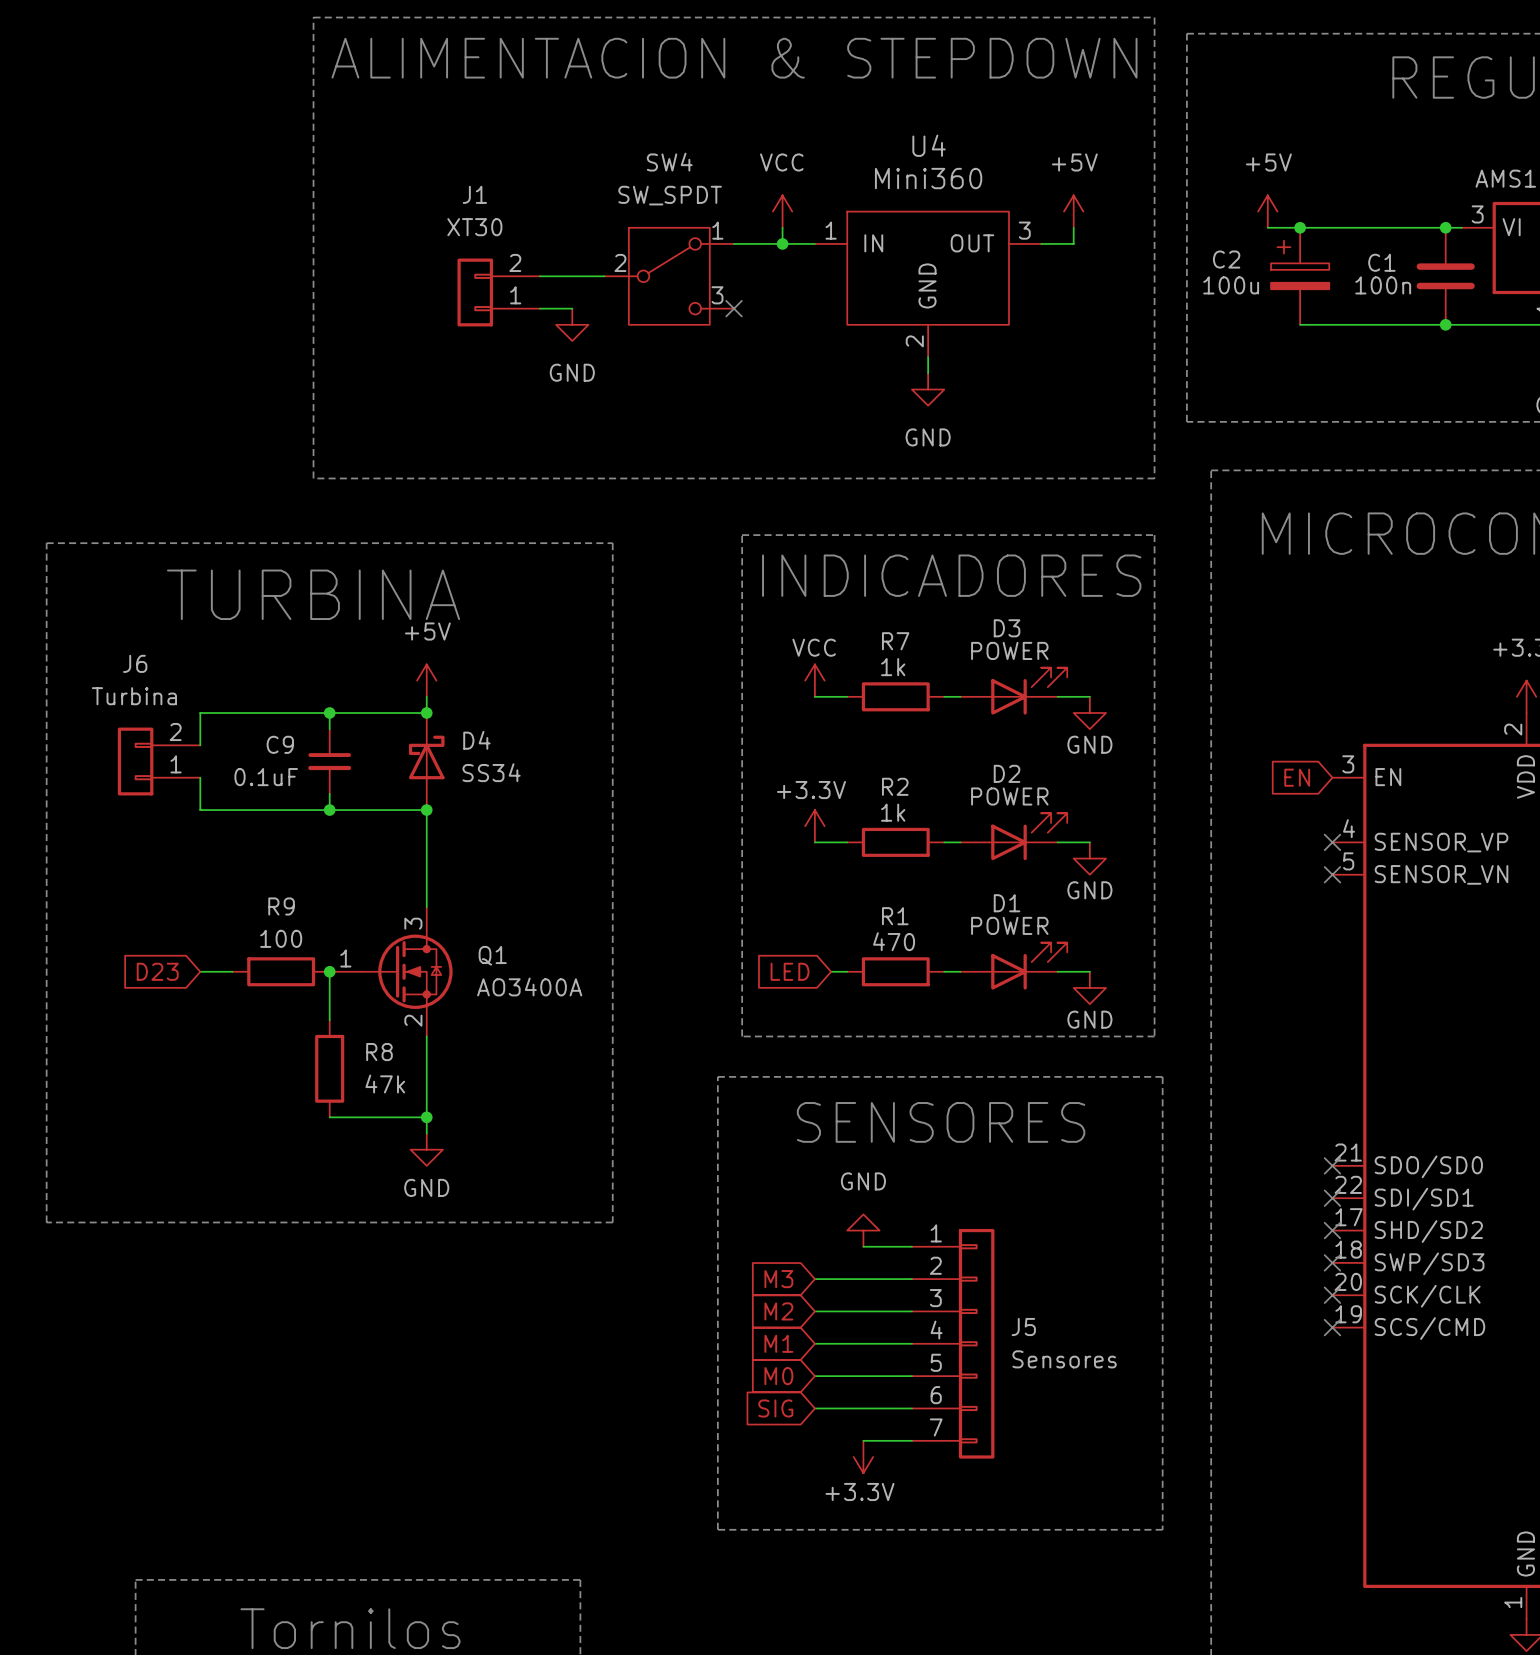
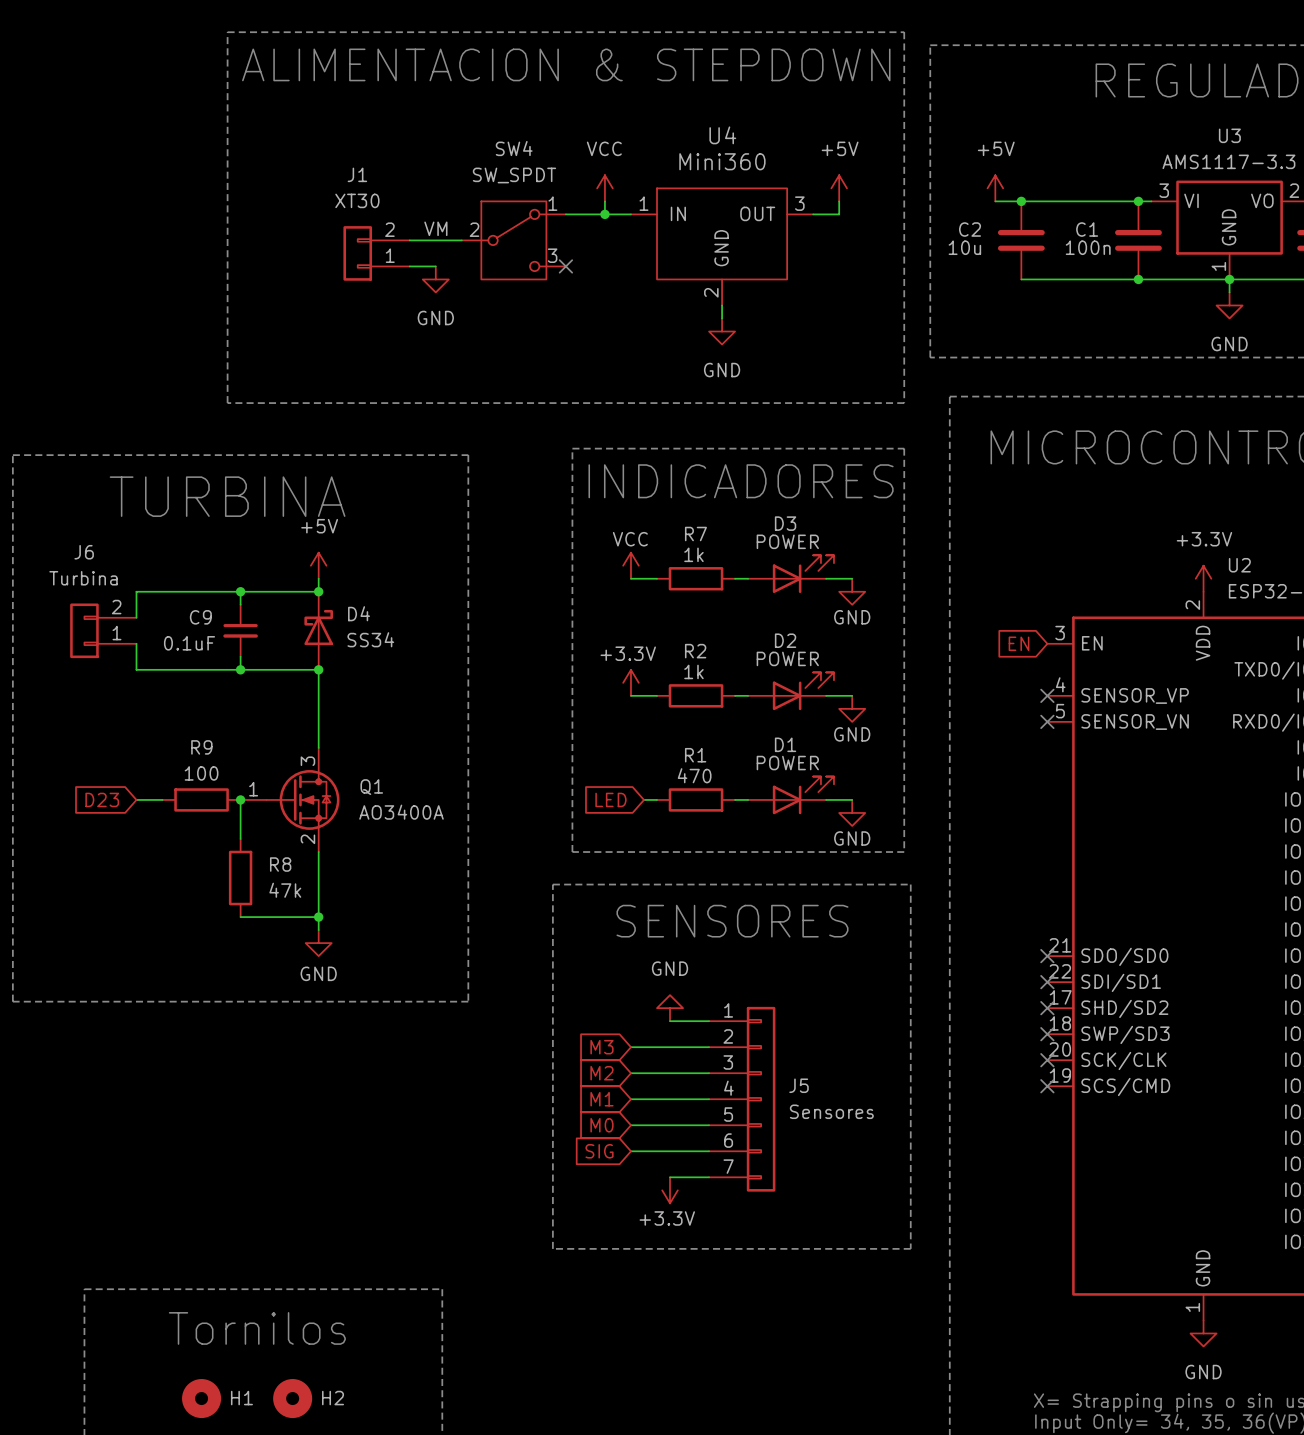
C2 symbol: [1271, 227, 1330, 325] -> [997, 201, 1045, 280]
label: none -> VM (435, 228)
C2 value: 100u (1231, 285) -> 10u (964, 247)

